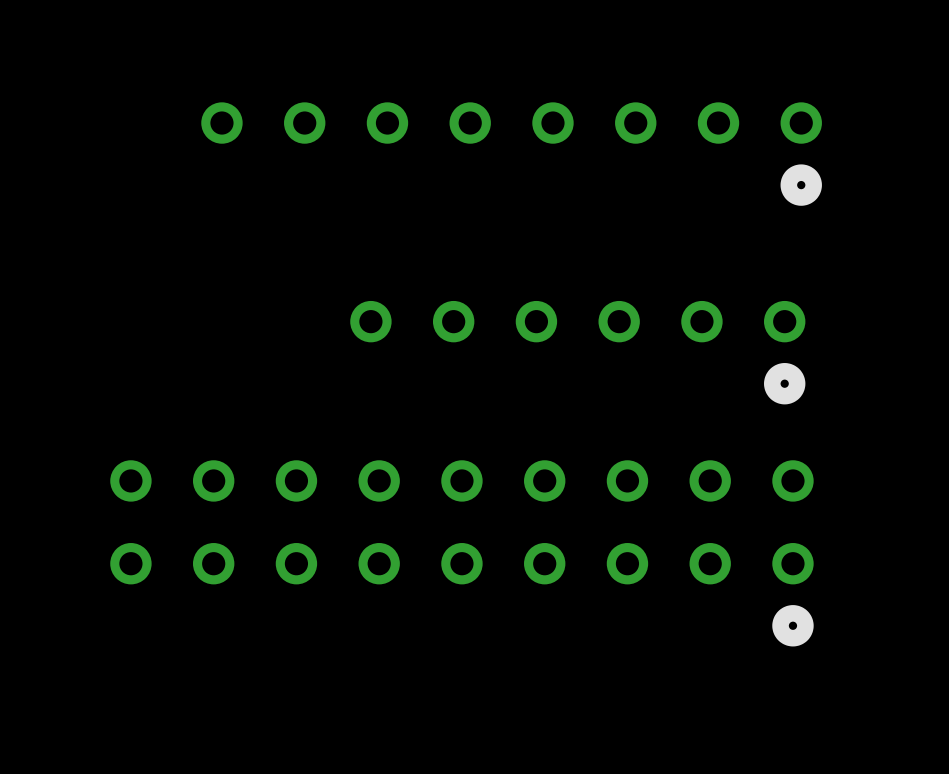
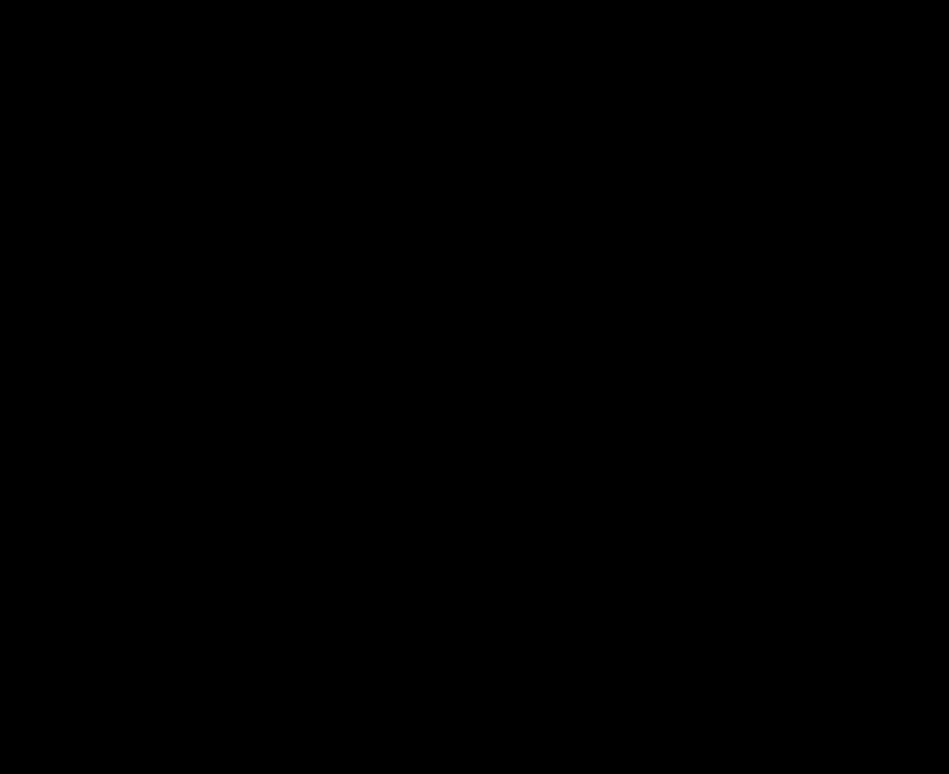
part: (511, 154) -> none
part: (577, 352) -> none
part: (461, 553) -> none

